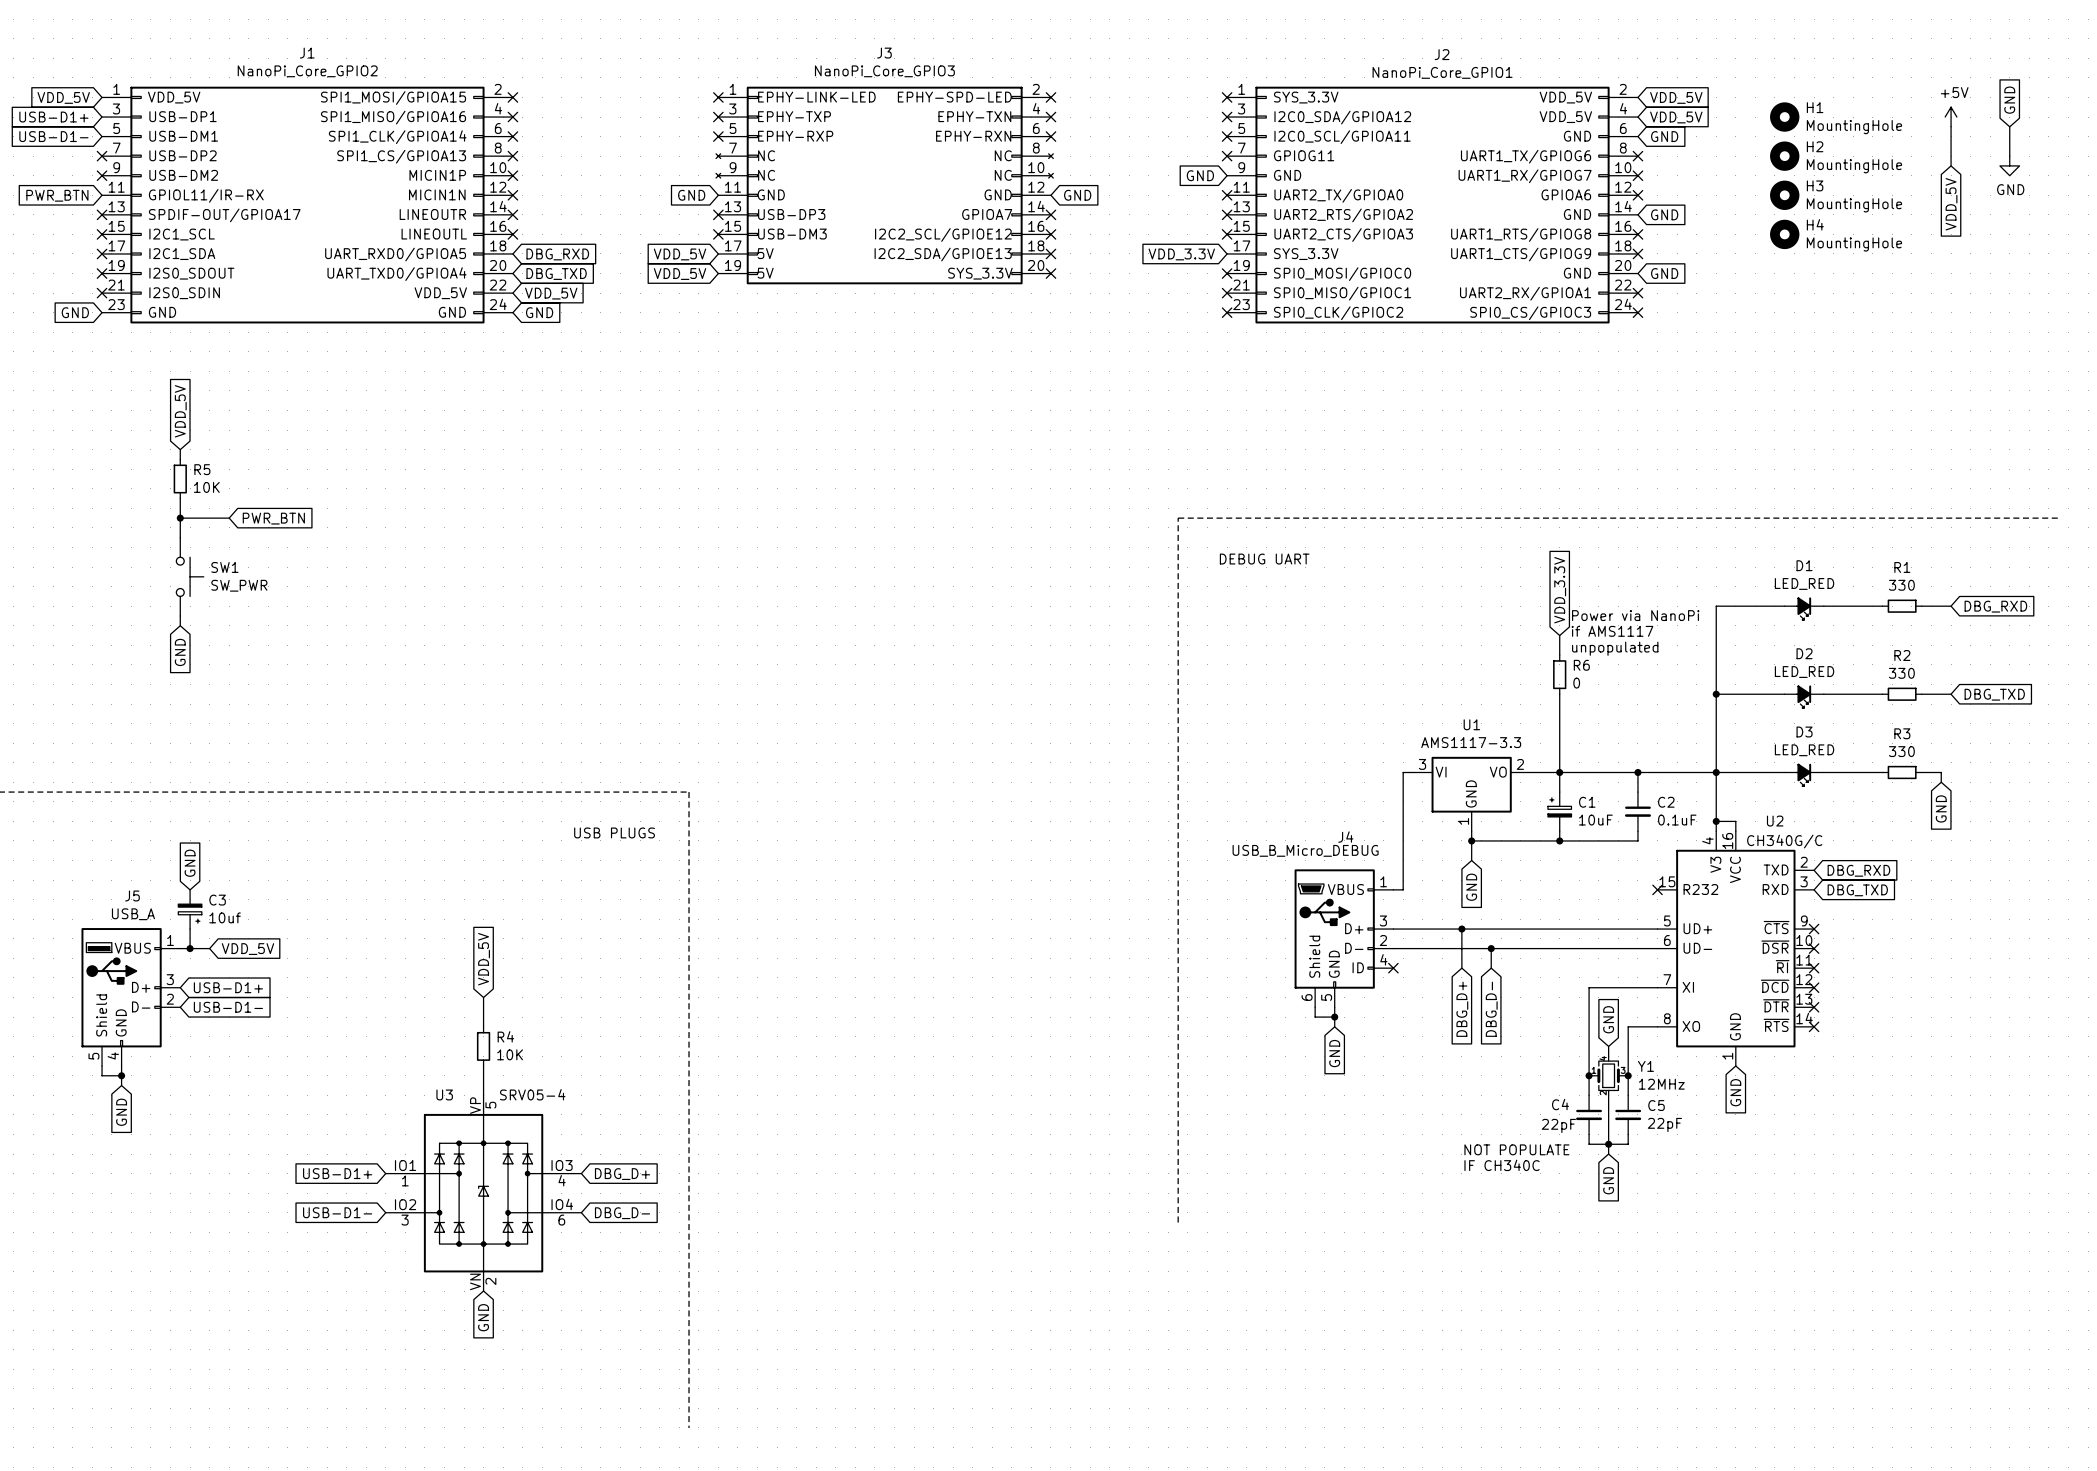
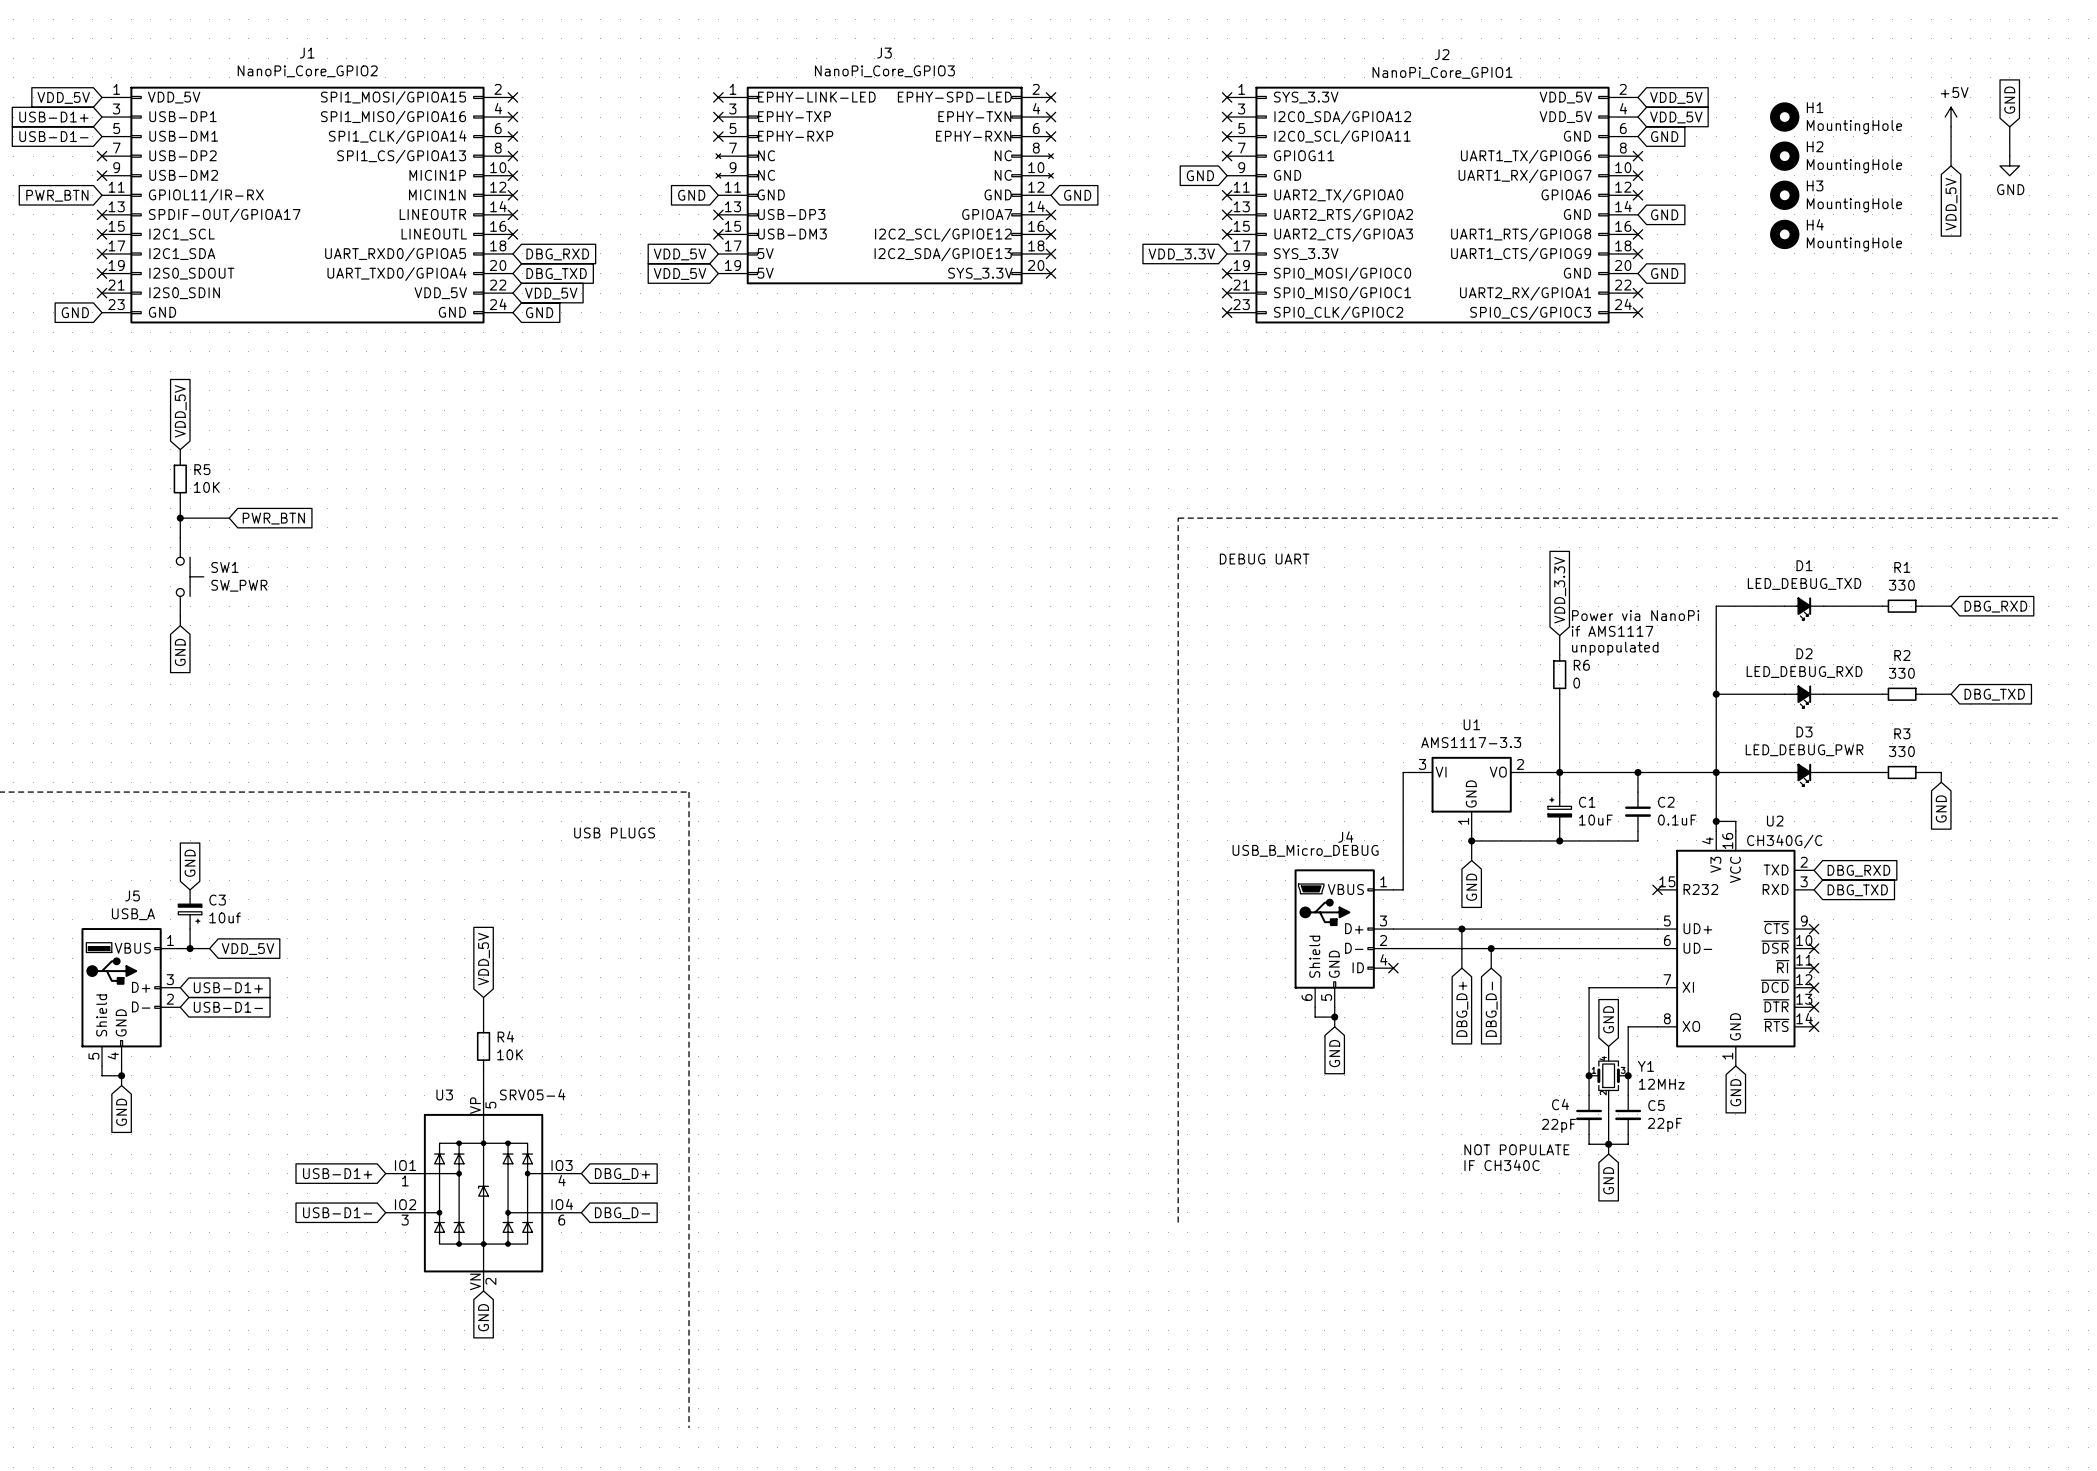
D1 value: LED_RED (1804, 583) -> LED_DEBUG_TXD (1804, 583)
D2 value: LED_RED (1804, 672) -> LED_DEBUG_RXD (1804, 672)
D3 value: LED_RED (1804, 750) -> LED_DEBUG_PWR (1804, 750)

